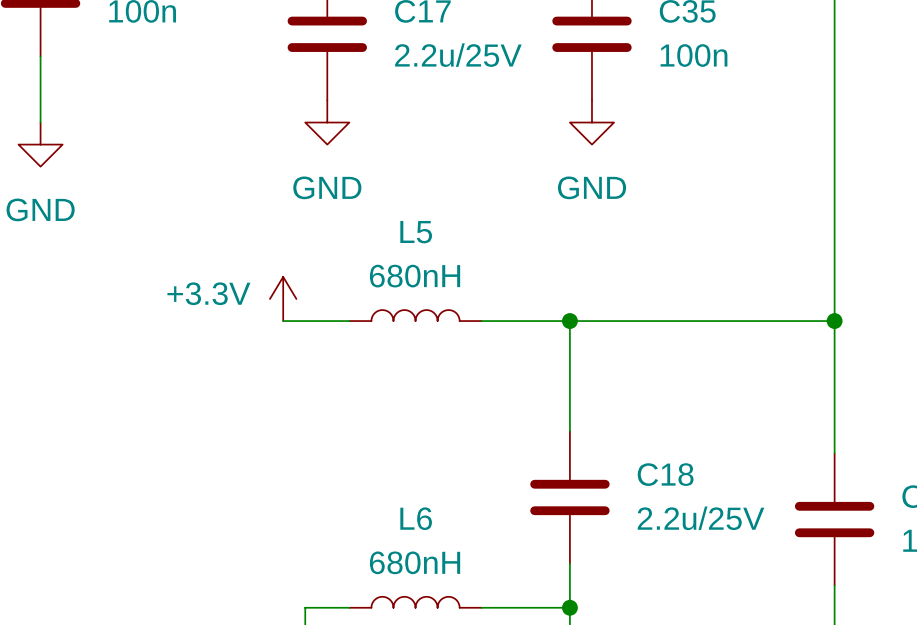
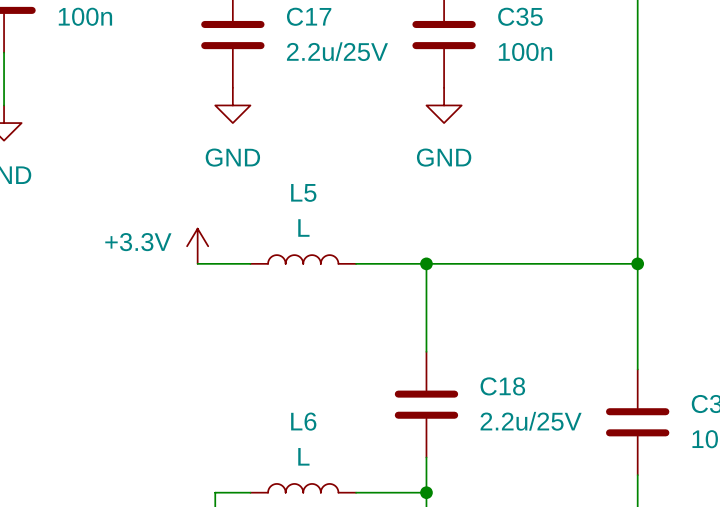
L5 value: 680nH (415, 276) -> L (303, 228)
L6 value: 680nH (415, 562) -> L (303, 456)

